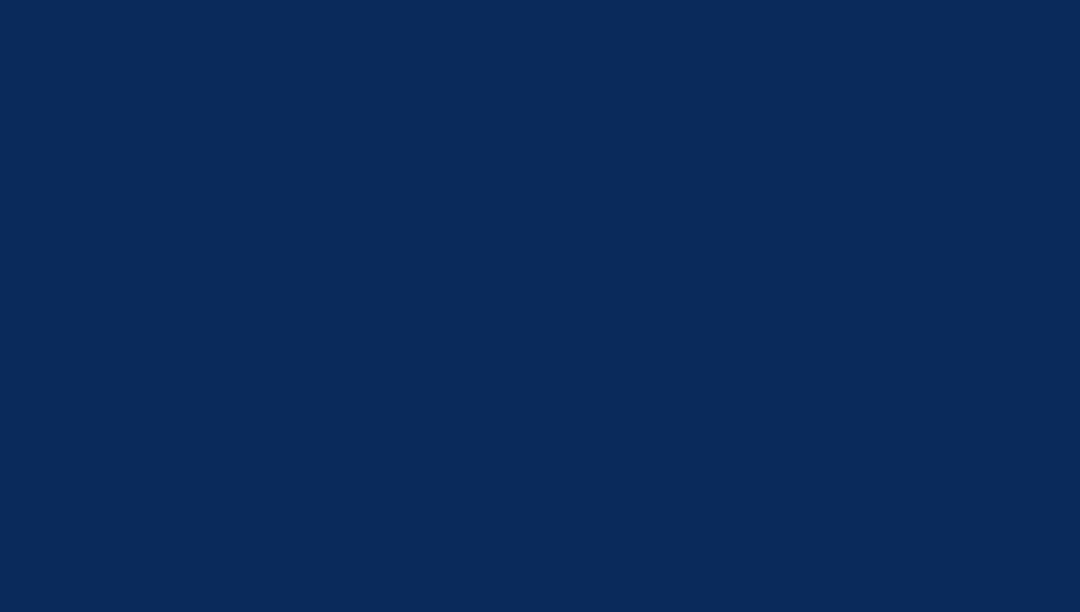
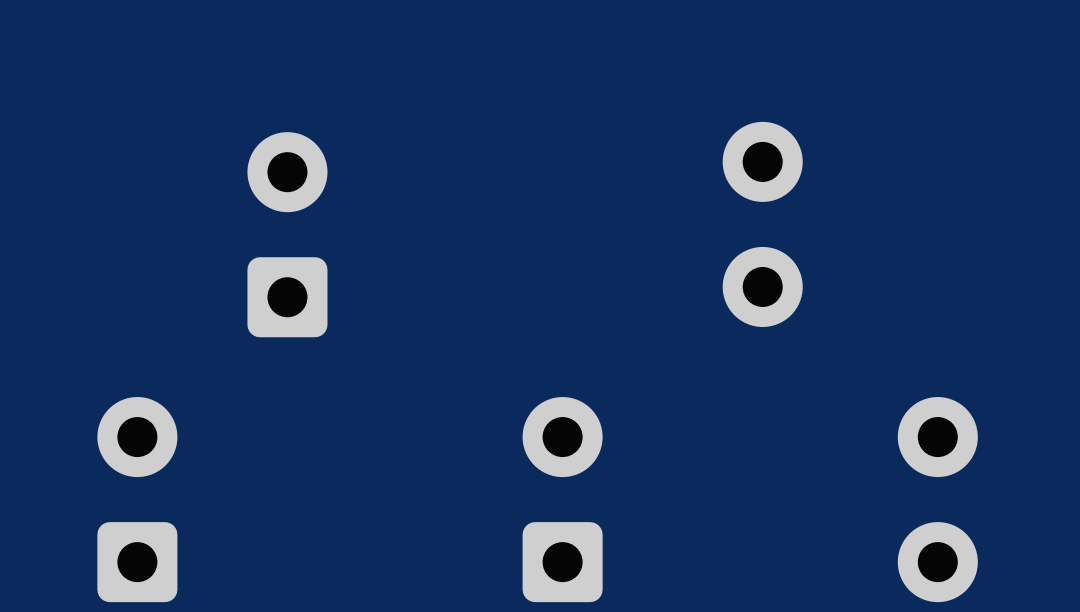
part: none -> (762, 224)
part: none -> (287, 234)
part: none -> (137, 499)
part: none -> (562, 499)
part: none -> (937, 499)

